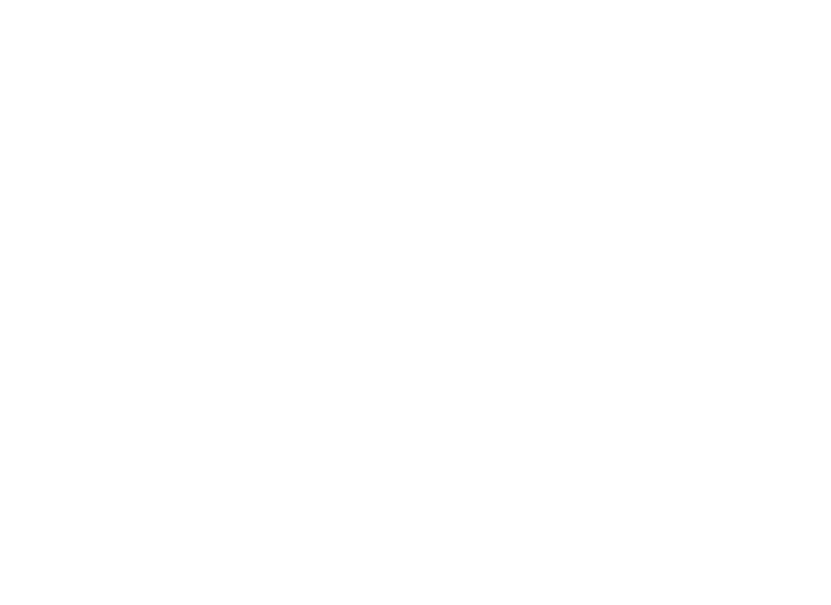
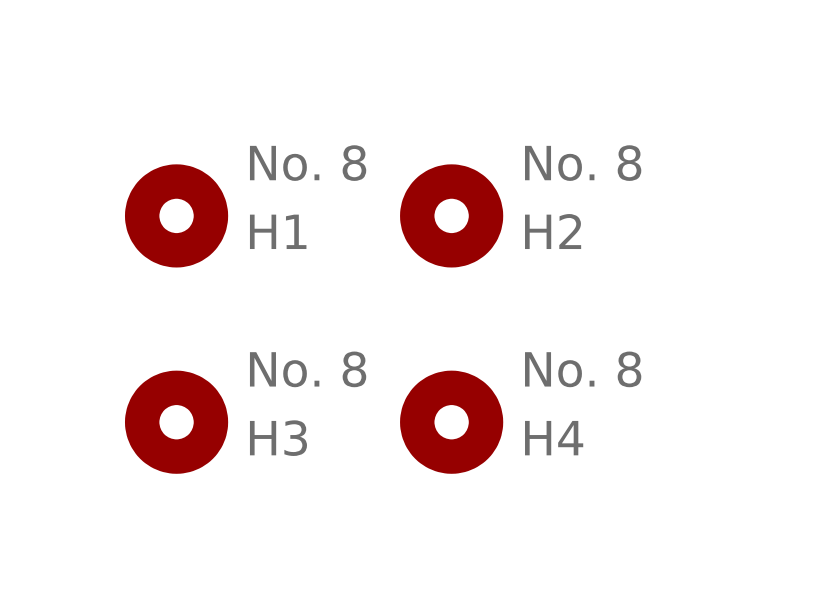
H1: none -> No. 8 (176, 215)
H2: none -> No. 8 (451, 215)
H3: none -> No. 8 (176, 422)
H4: none -> No. 8 (451, 422)

